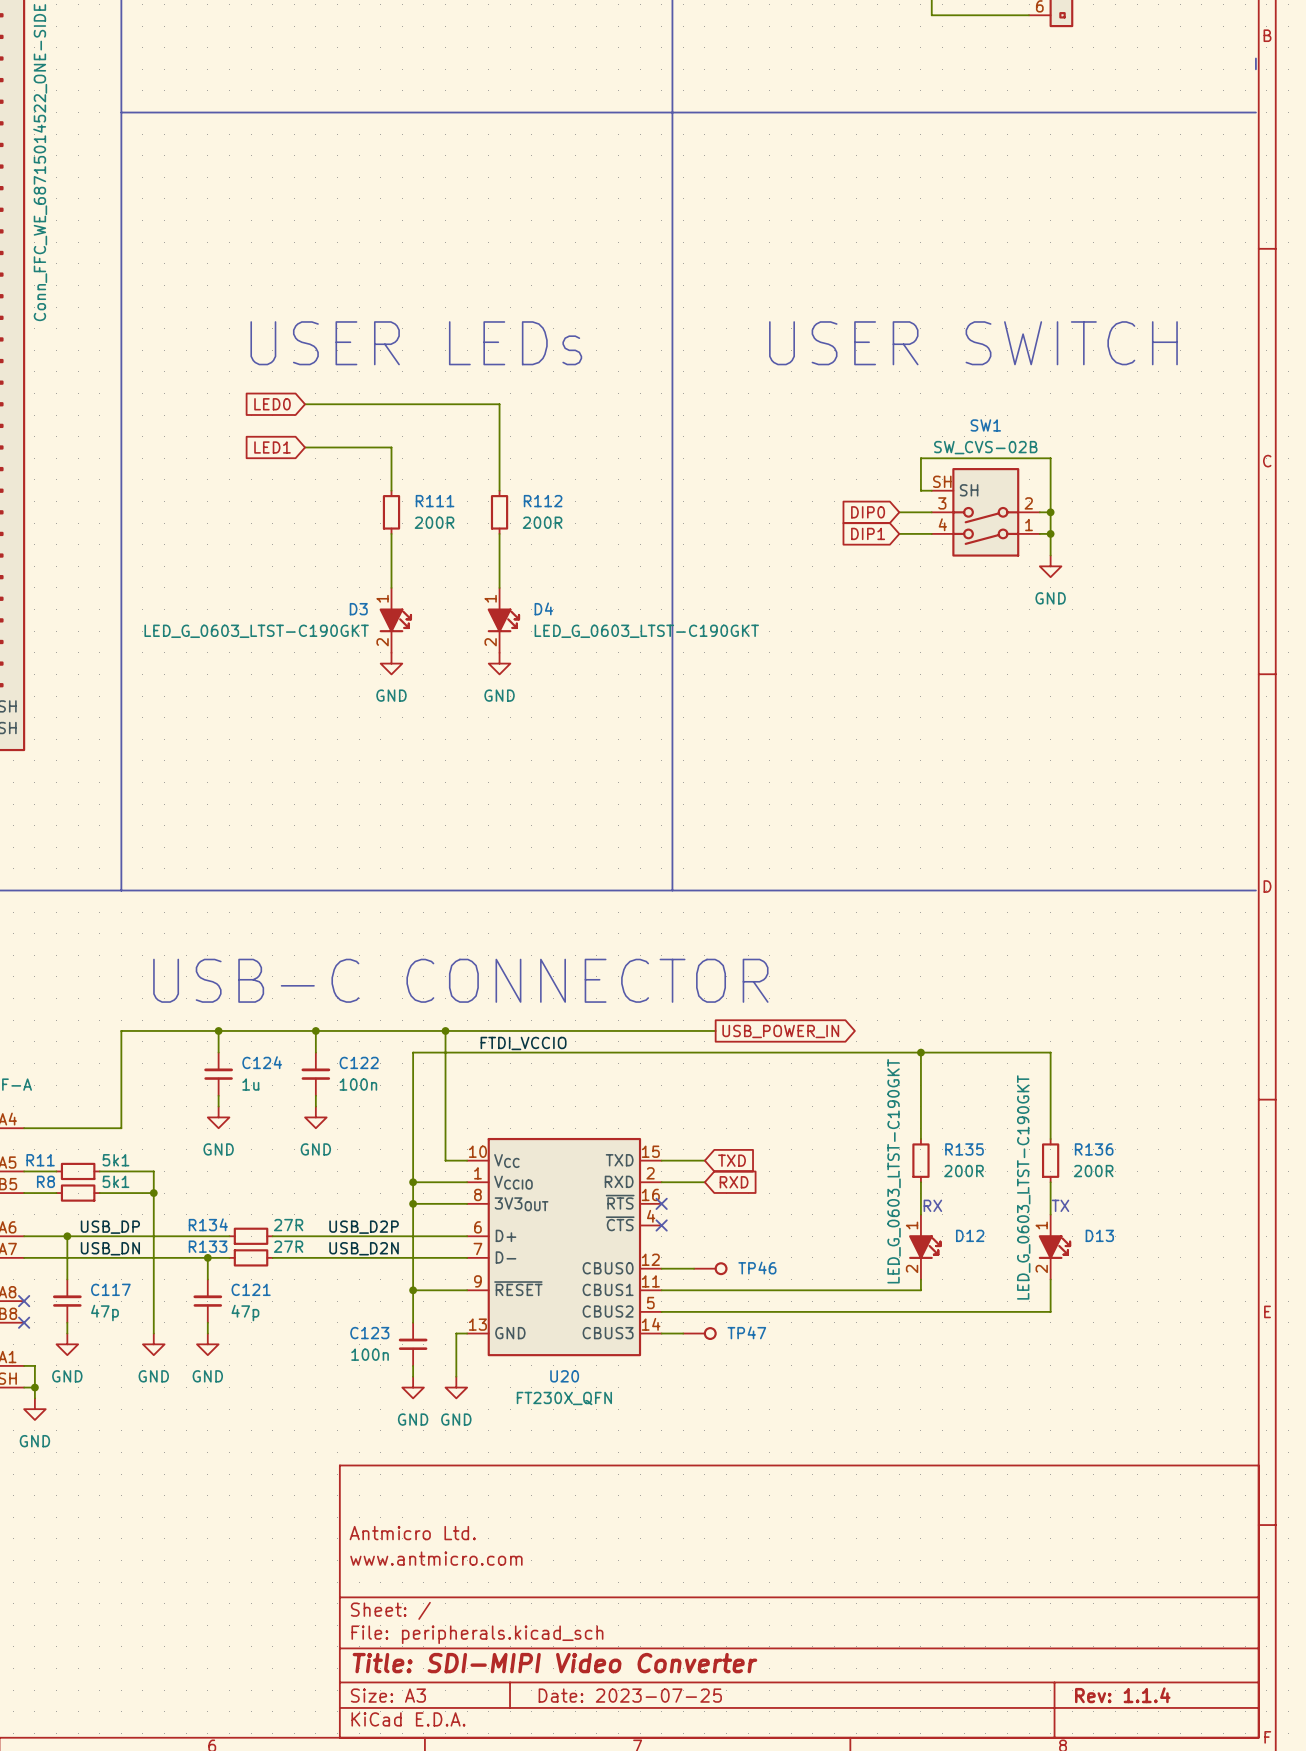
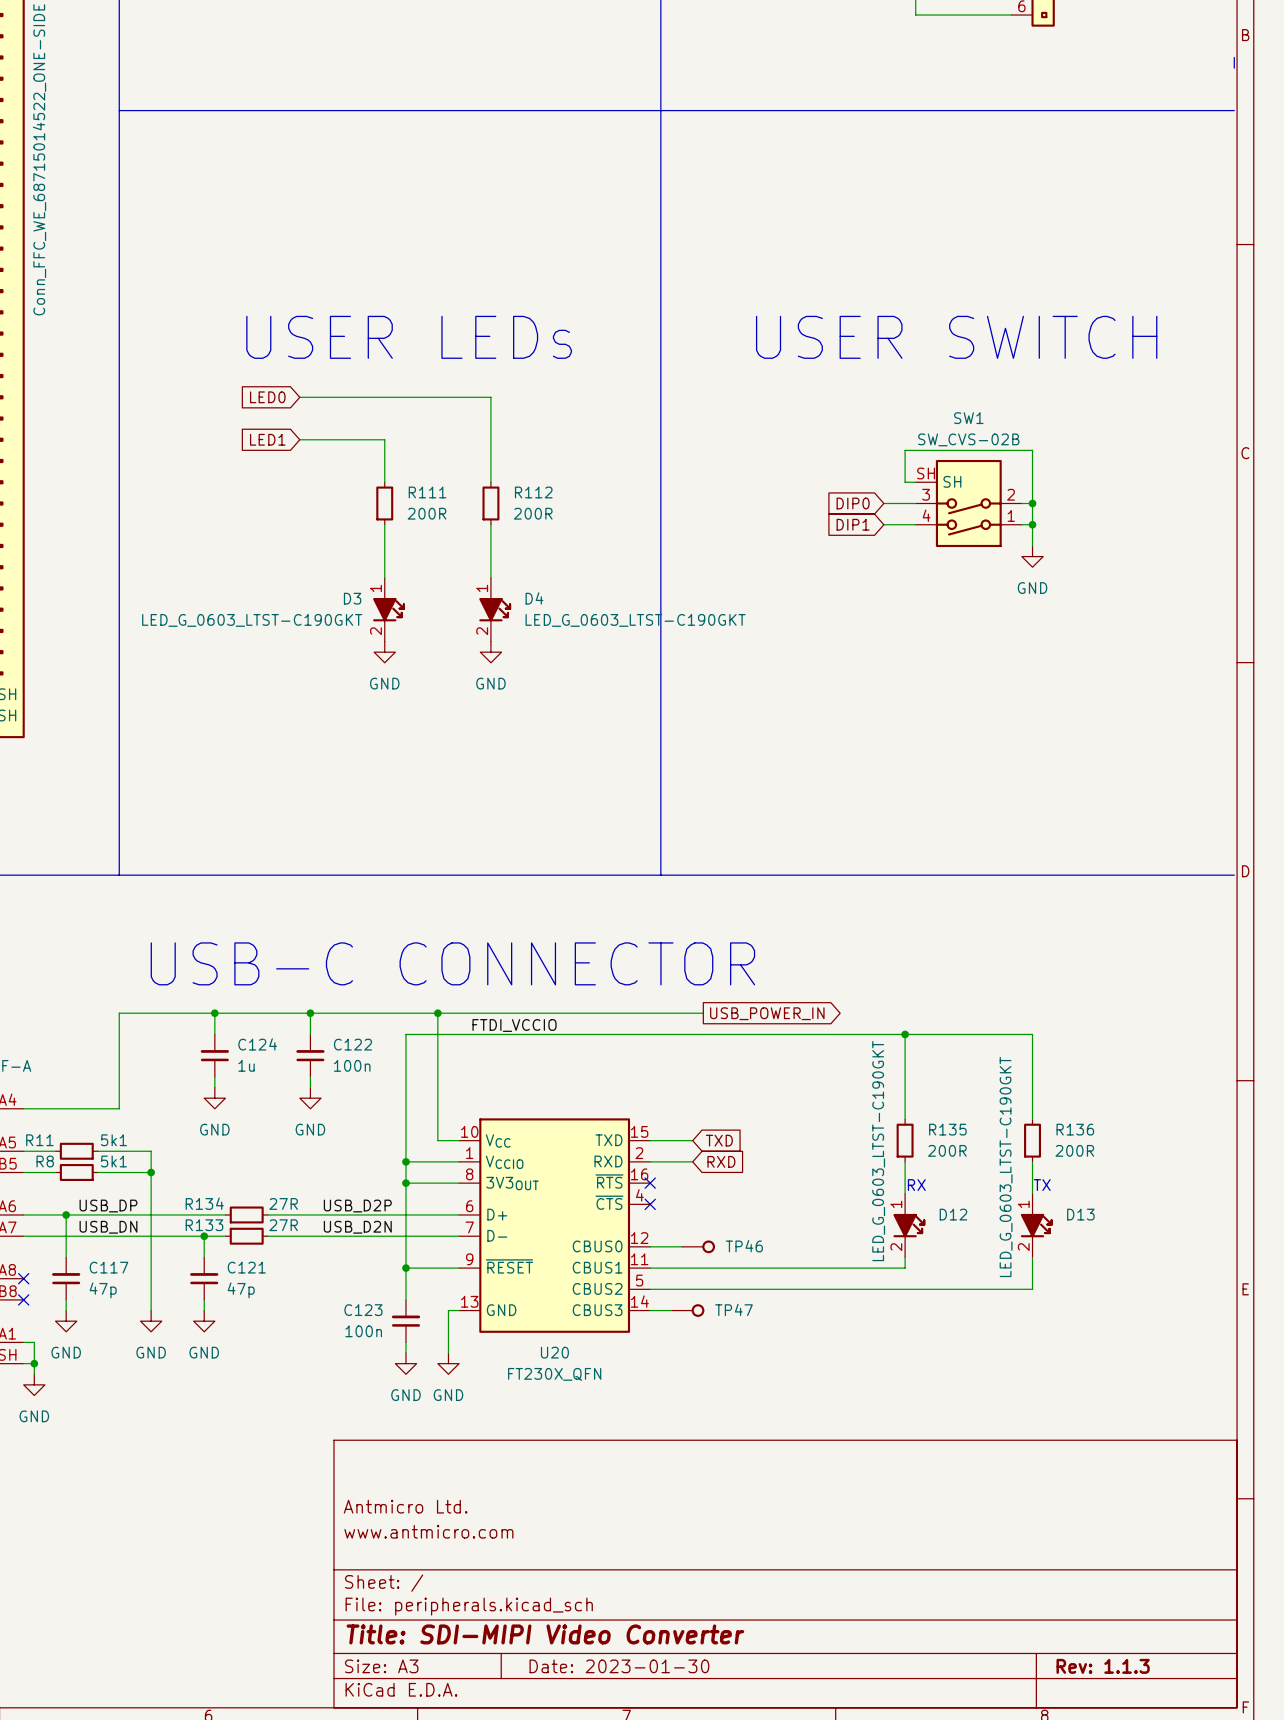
title block: Date: 2023-07-25 (630, 1695) -> Date: 2023-01-30 (619, 1666)
title block: Rev: 1.1.4 (1122, 1695) -> Rev: 1.1.3 (1103, 1666)

